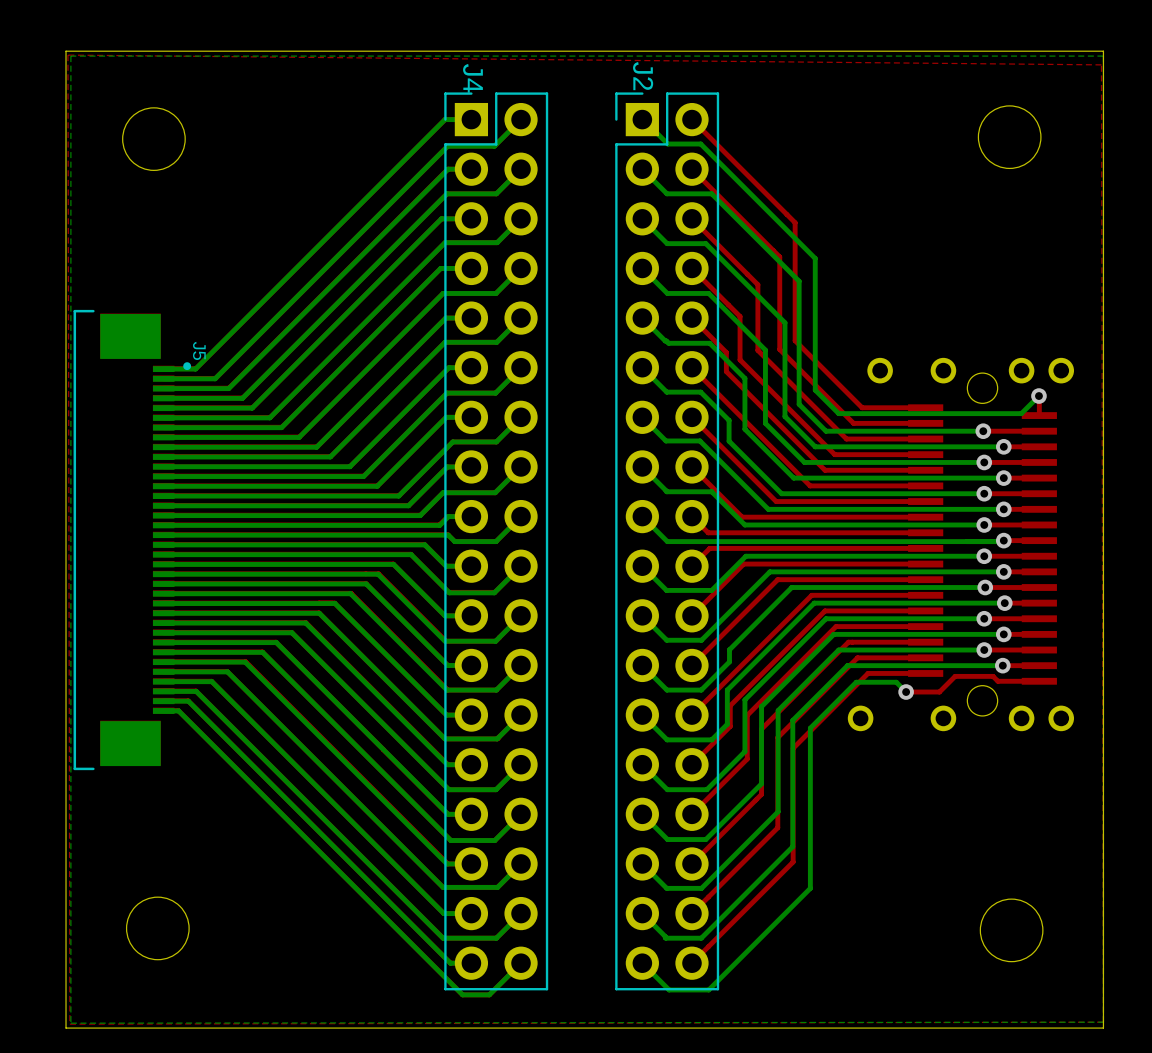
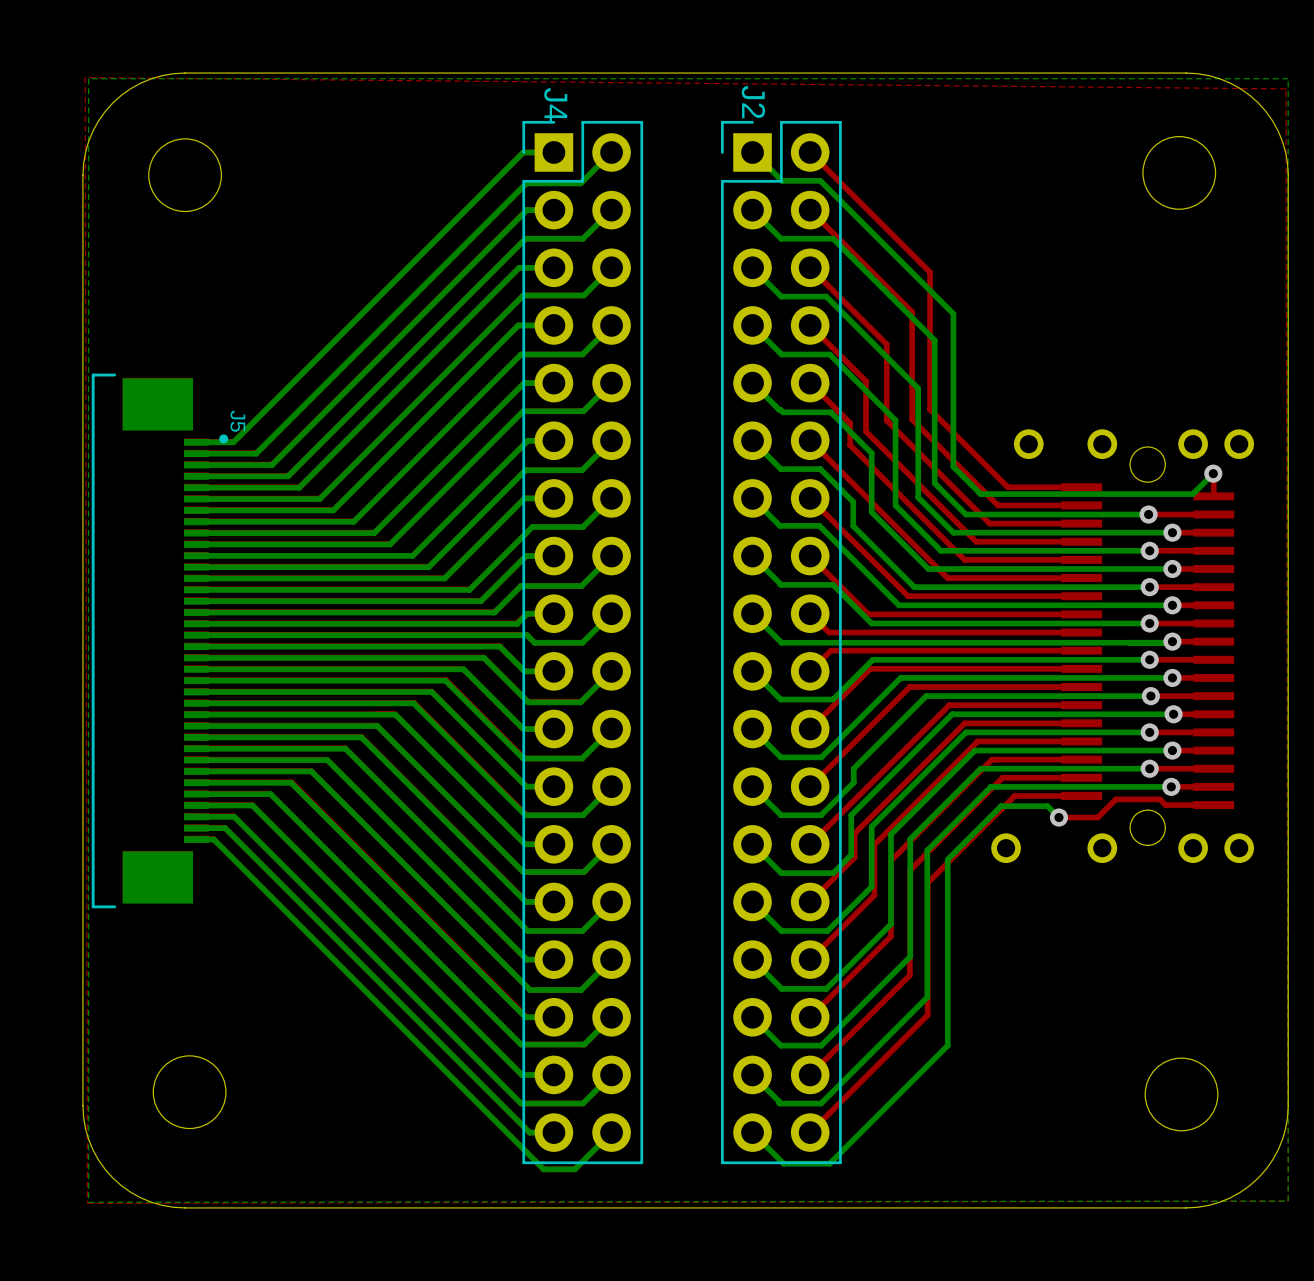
board edge: (153, 51) (66, 51) (66, 139) -> (185, 73) (162, 75) (140, 83) (112, 102) (98, 120) (88, 141) (82, 175)
board edge: (1015, 51) (1103, 51) (1103, 139) -> (1186, 73) (1208, 75) (1230, 83) (1258, 102) (1272, 120) (1282, 141) (1288, 175)
board edge: (66, 940) (66, 1028) (153, 1028) -> (82, 1105) (88, 1139) (98, 1160) (112, 1178) (140, 1197) (162, 1205) (185, 1207)
board edge: (1103, 940) (1103, 1028) (1015, 1028) -> (1288, 1105) (1282, 1139) (1272, 1160) (1258, 1178) (1230, 1197) (1208, 1205) (1186, 1207)

